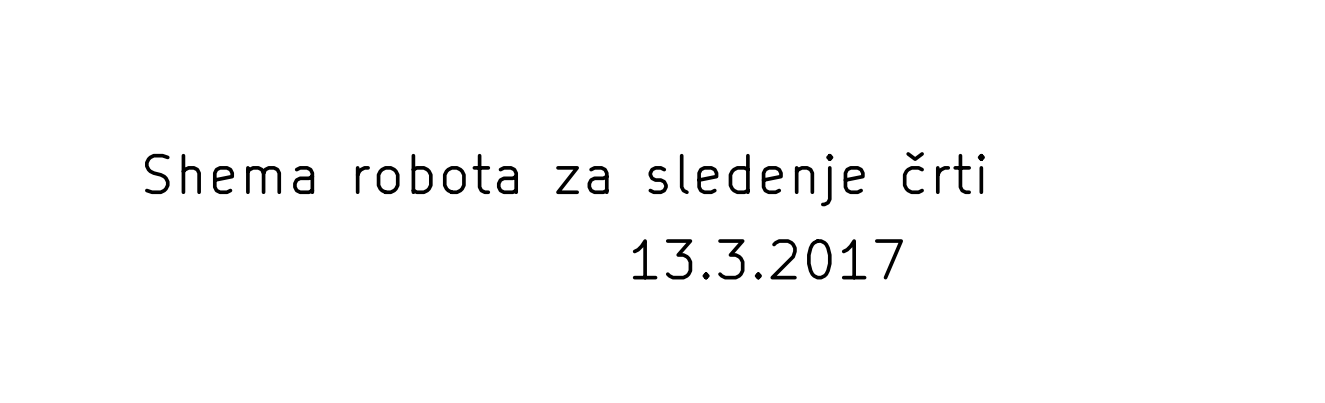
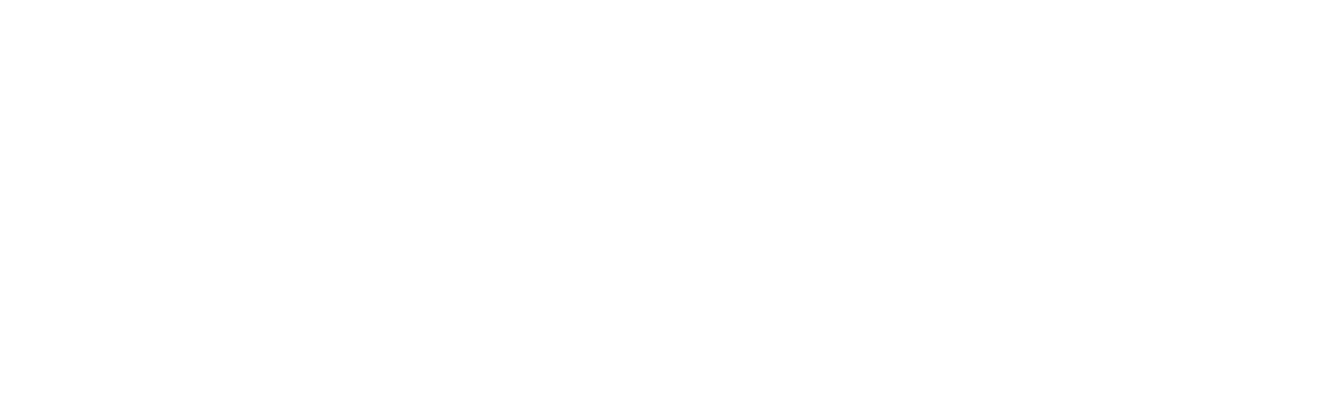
label: Shema robota za sledenje črti (564, 179) -> none
label: 13.3.2017 (767, 259) -> none

